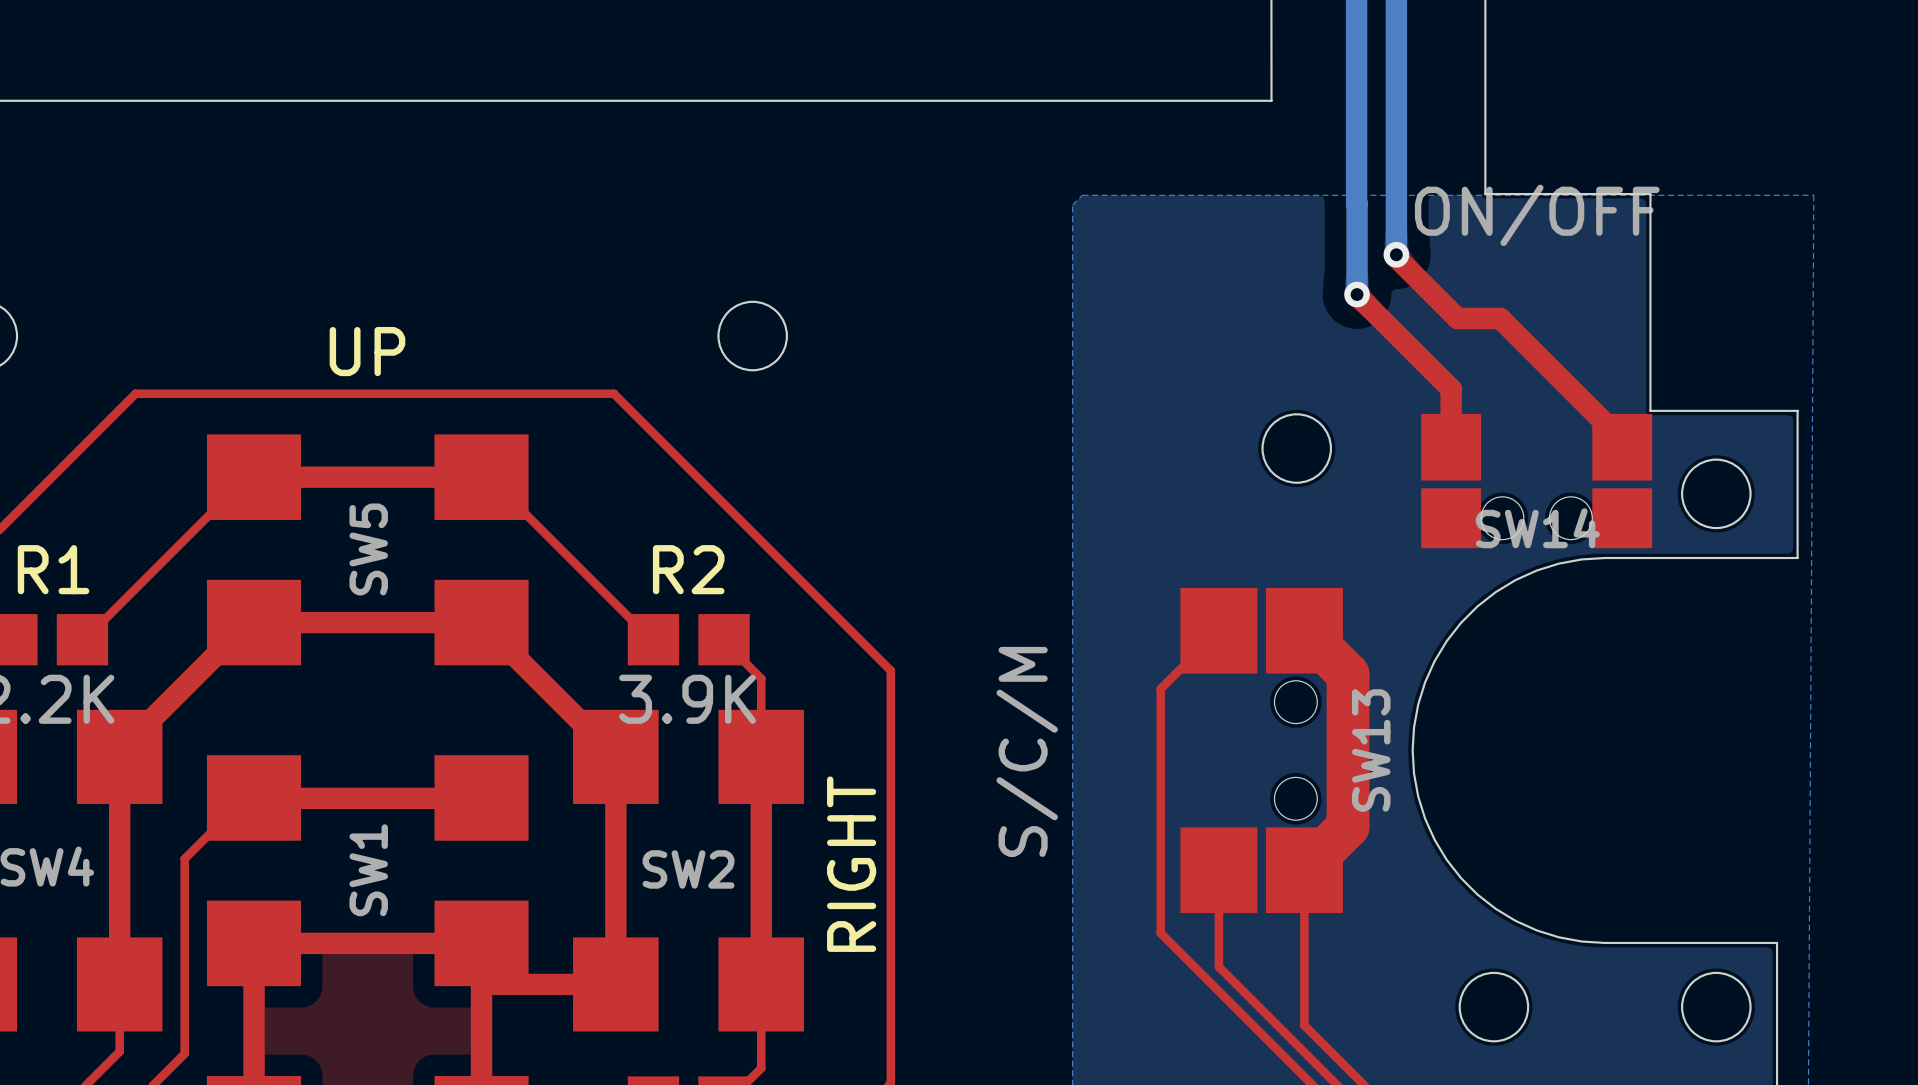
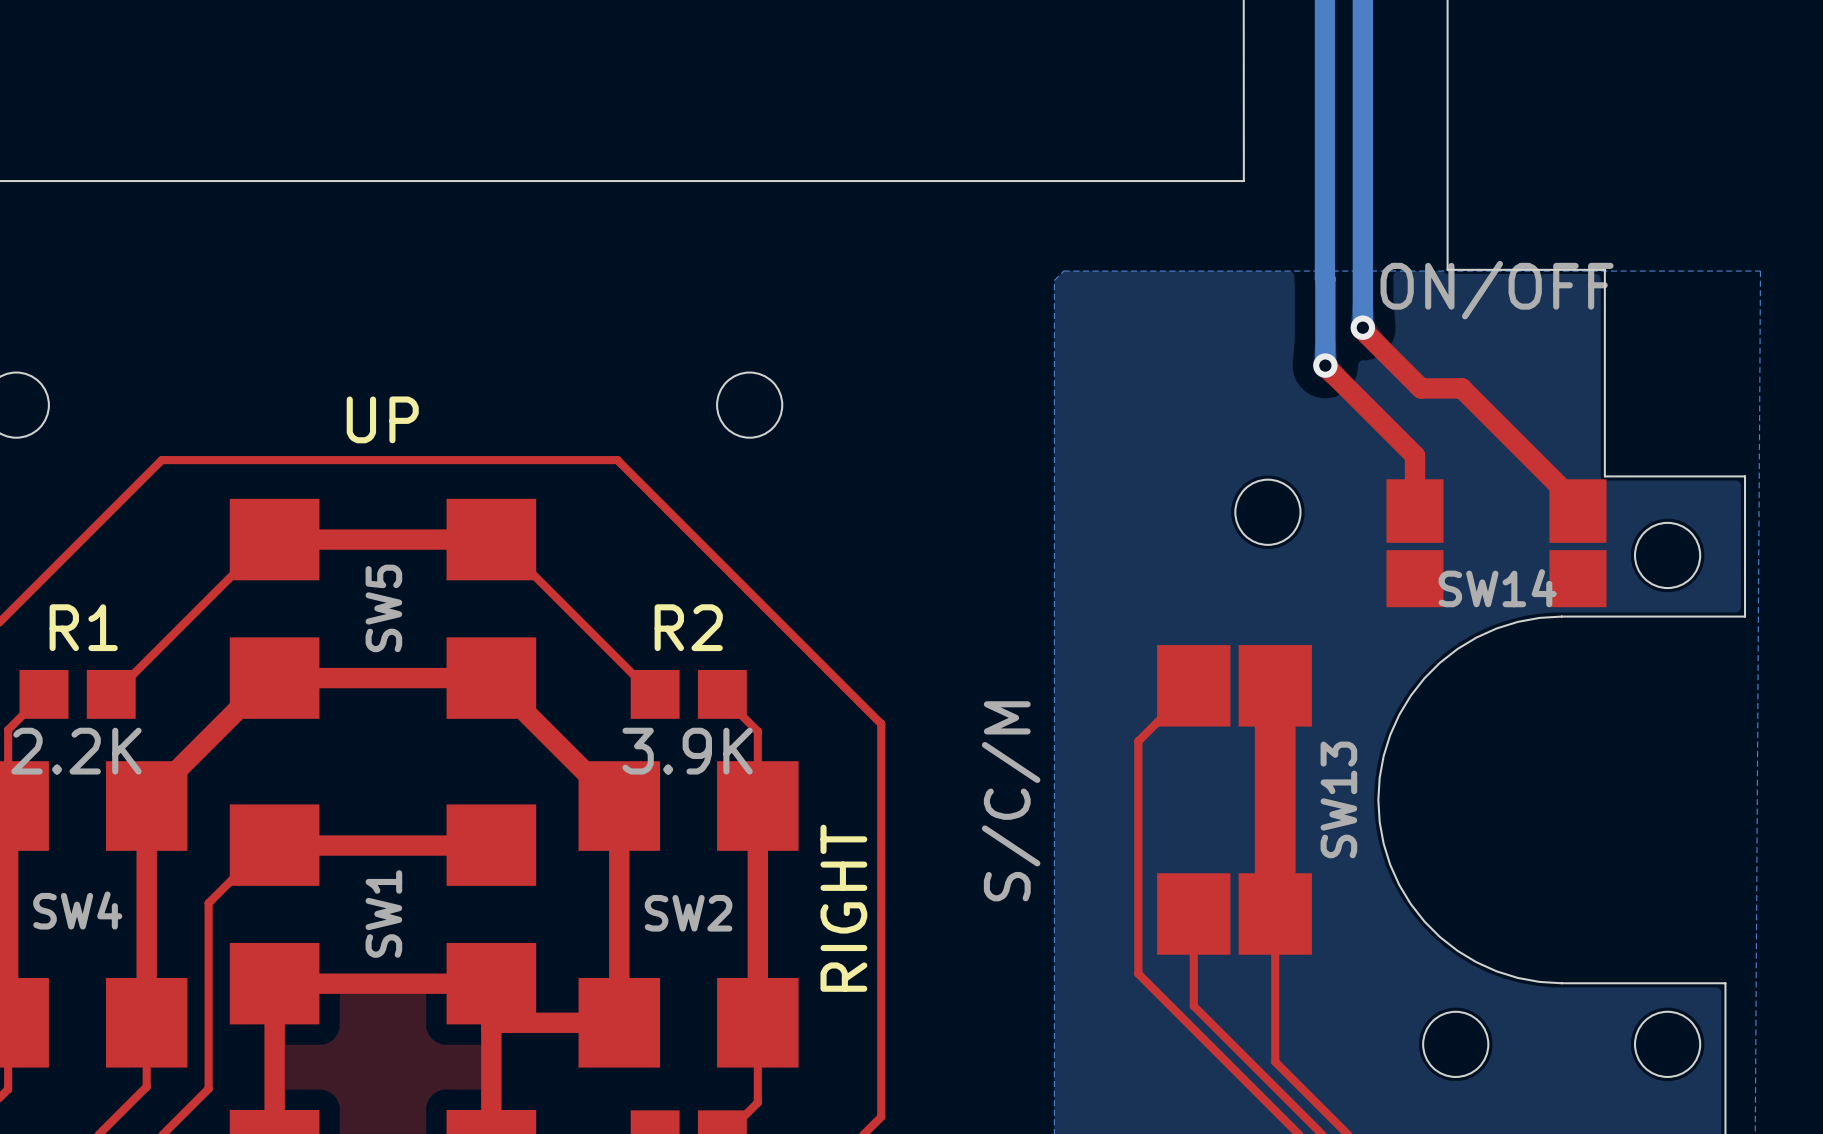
SW14 footprint: [1421, 413, 1653, 549] -> [1386, 479, 1607, 608]
SW13 footprint: [1180, 587, 1343, 914] -> [1157, 645, 1312, 955]
top track: (1304, 630) (1348, 674) (1348, 826) (1304, 870) -> (1275, 685) (1275, 913)

